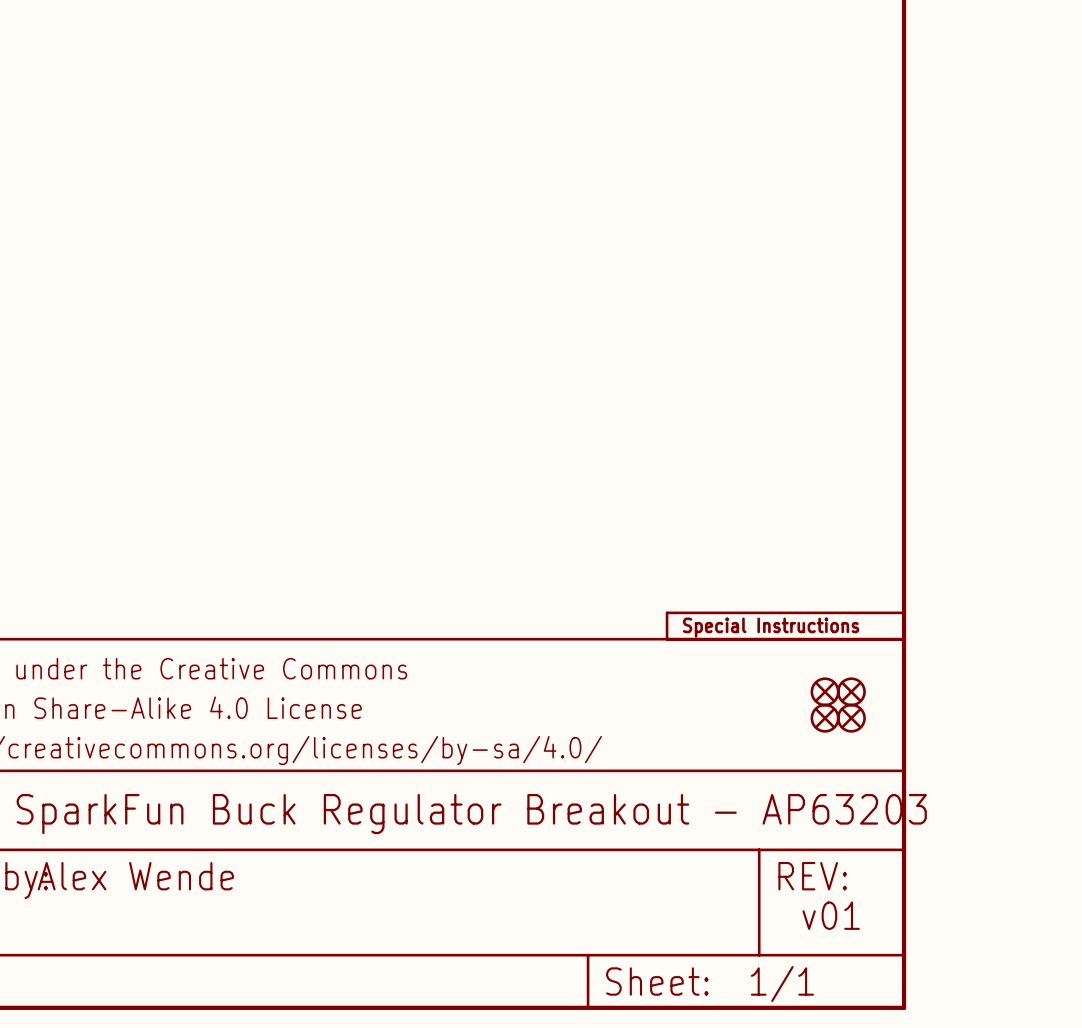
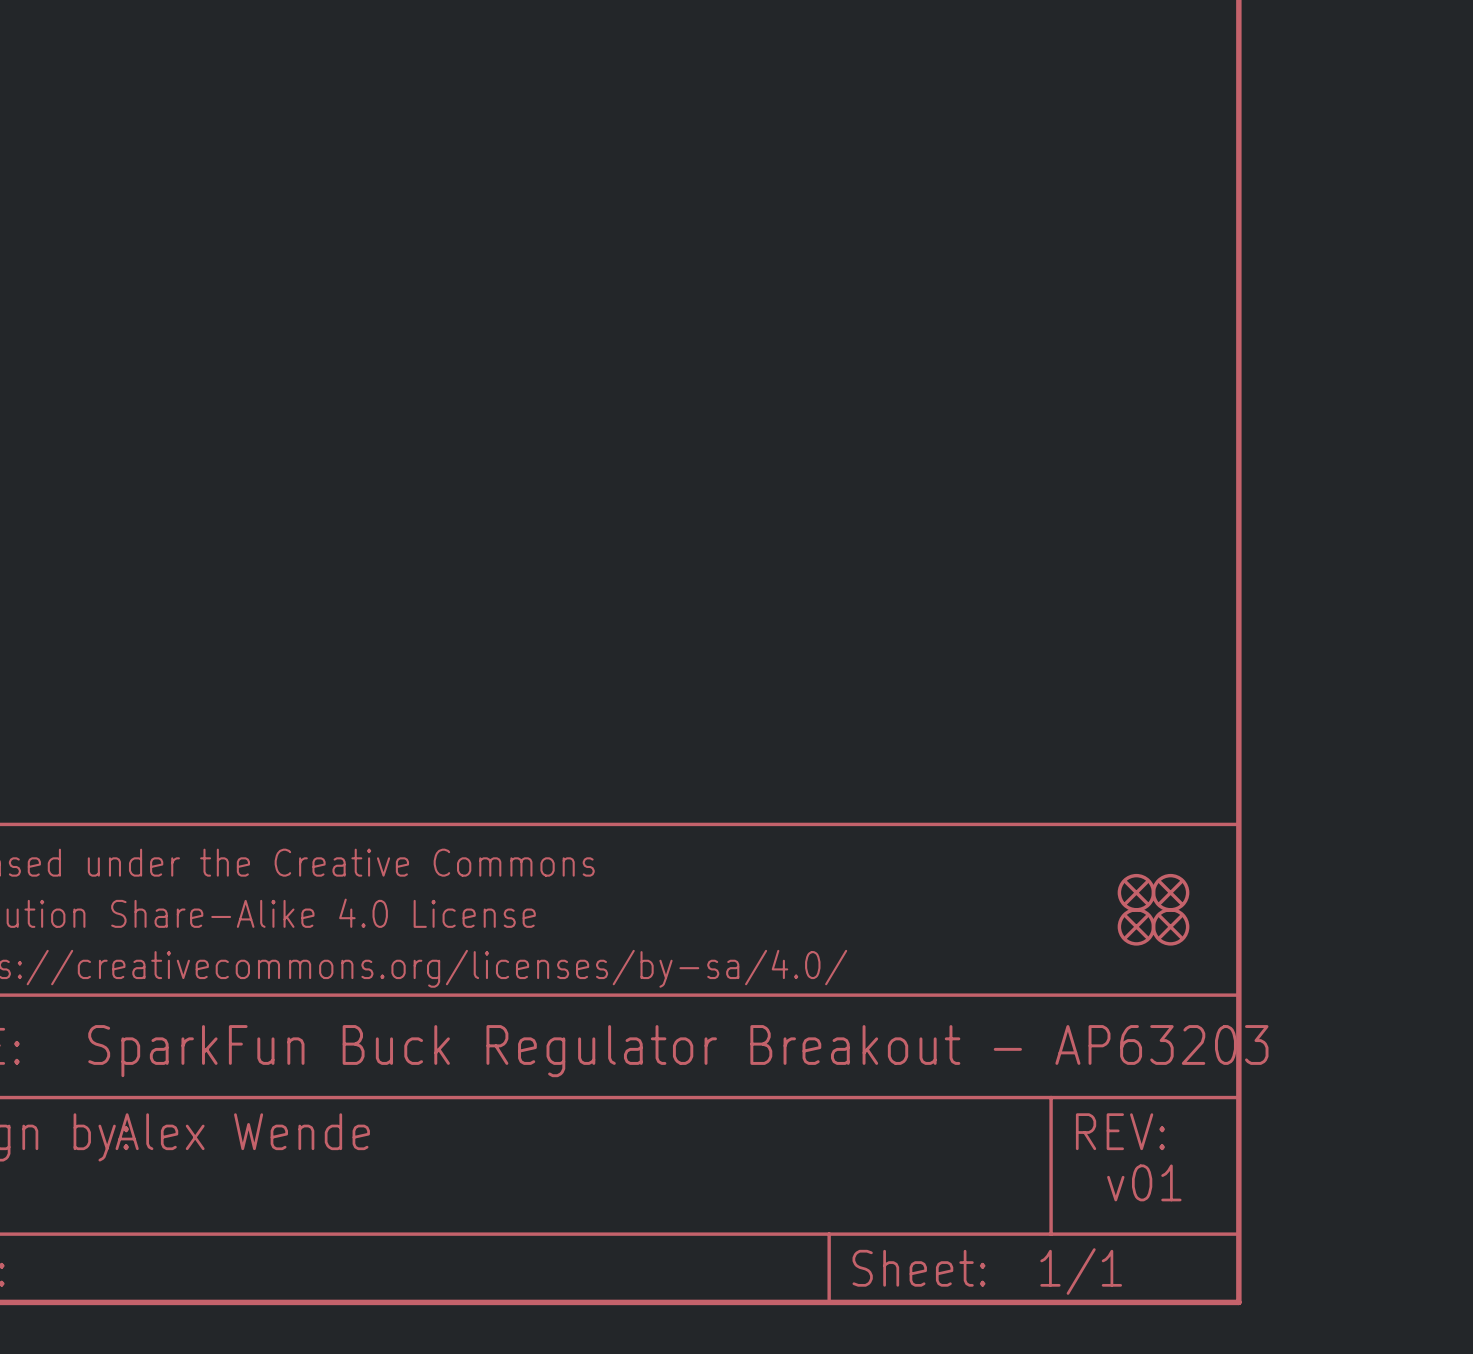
part: (785, 626) -> none

